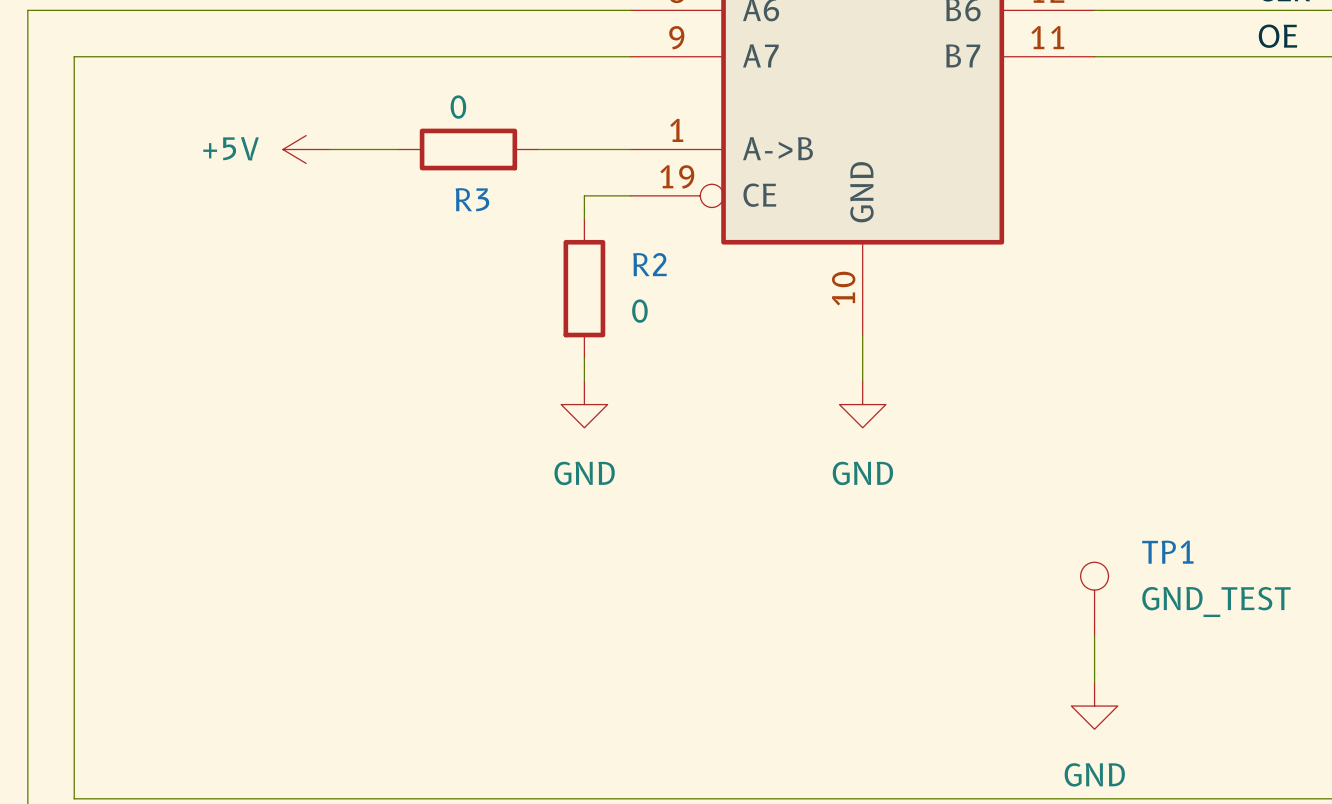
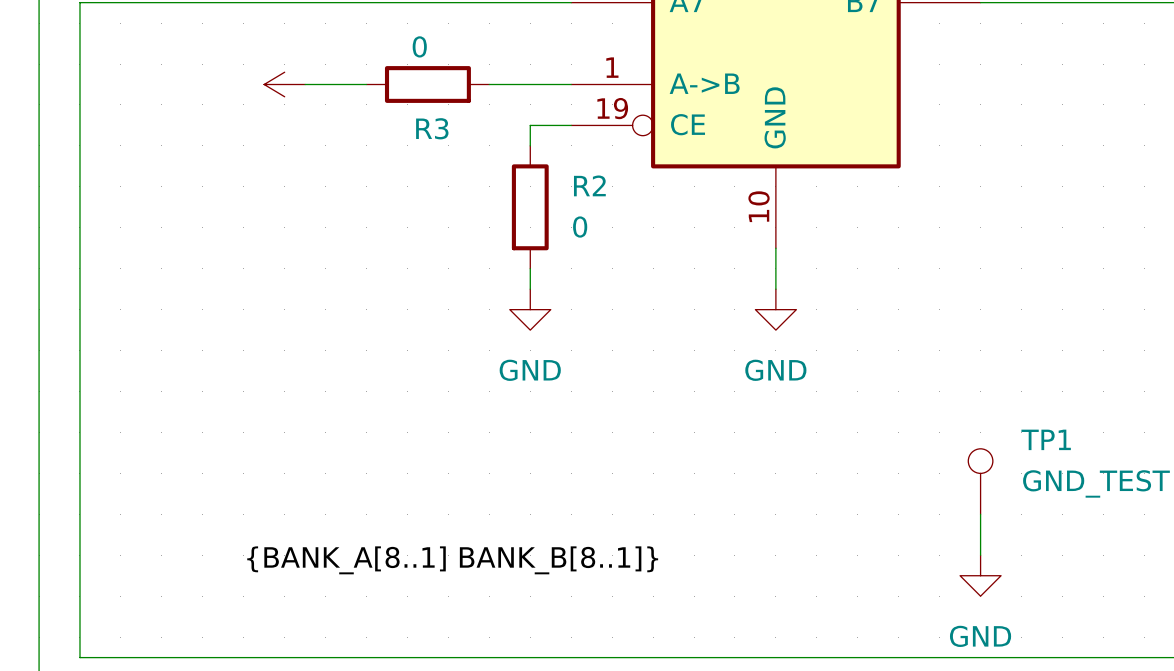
power symbol text: +5V (231, 148) -> none
label: none -> {BANK_A[8..1] BANK_B[8..1]} (452, 560)

